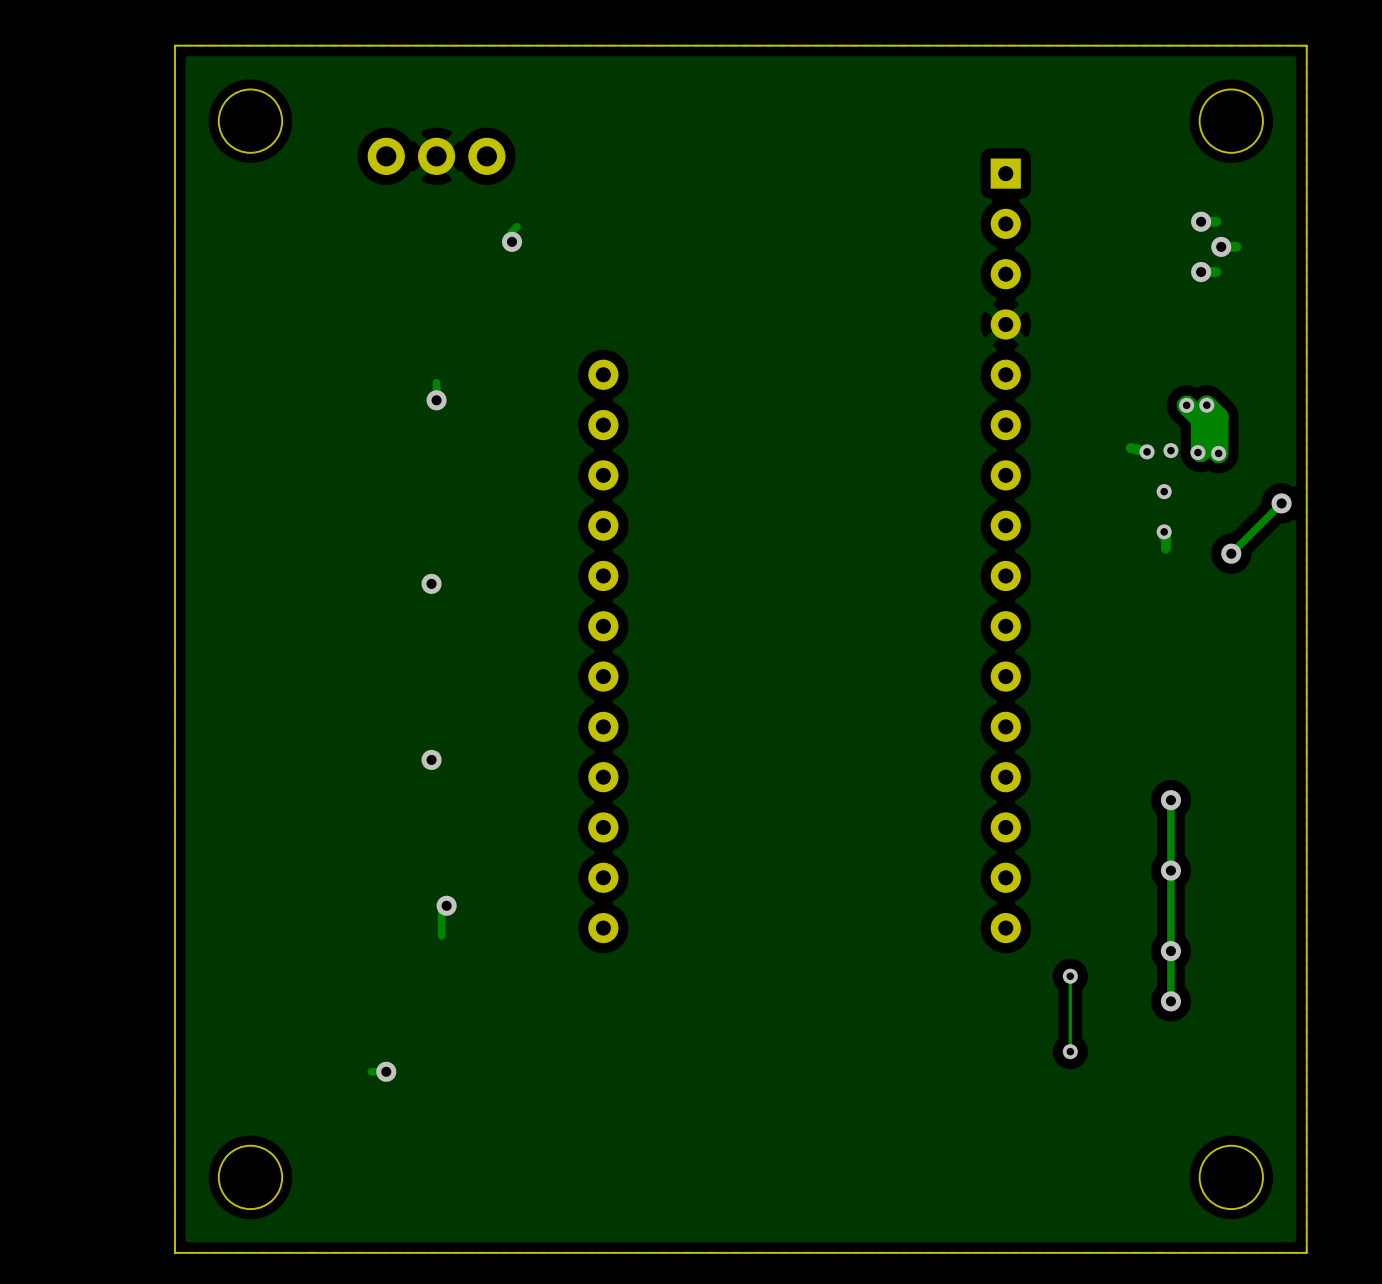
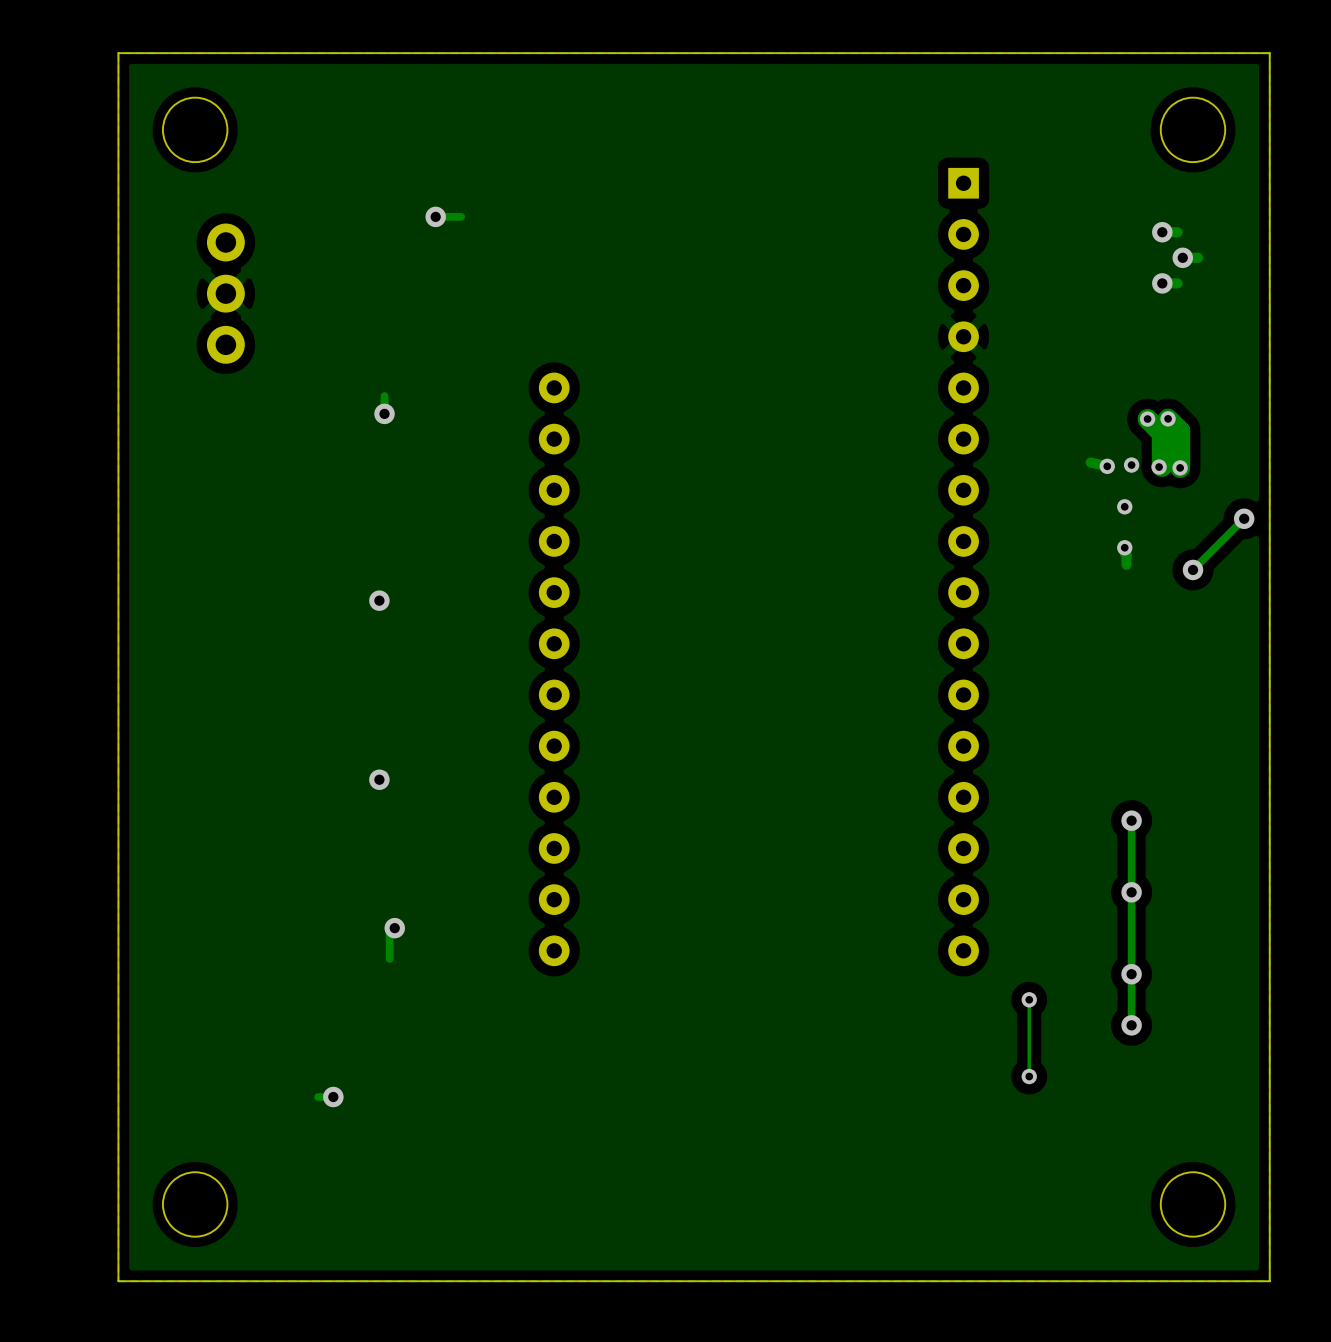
part rotation: 0° (436, 156) -> 90° clockwise (225, 293)
part position: (436, 156) -> (225, 293)
track: none -> (461, 216) (435, 216)
track: (517, 226) (512, 231) (512, 241) -> none
via position: (512, 241) -> (435, 216)

